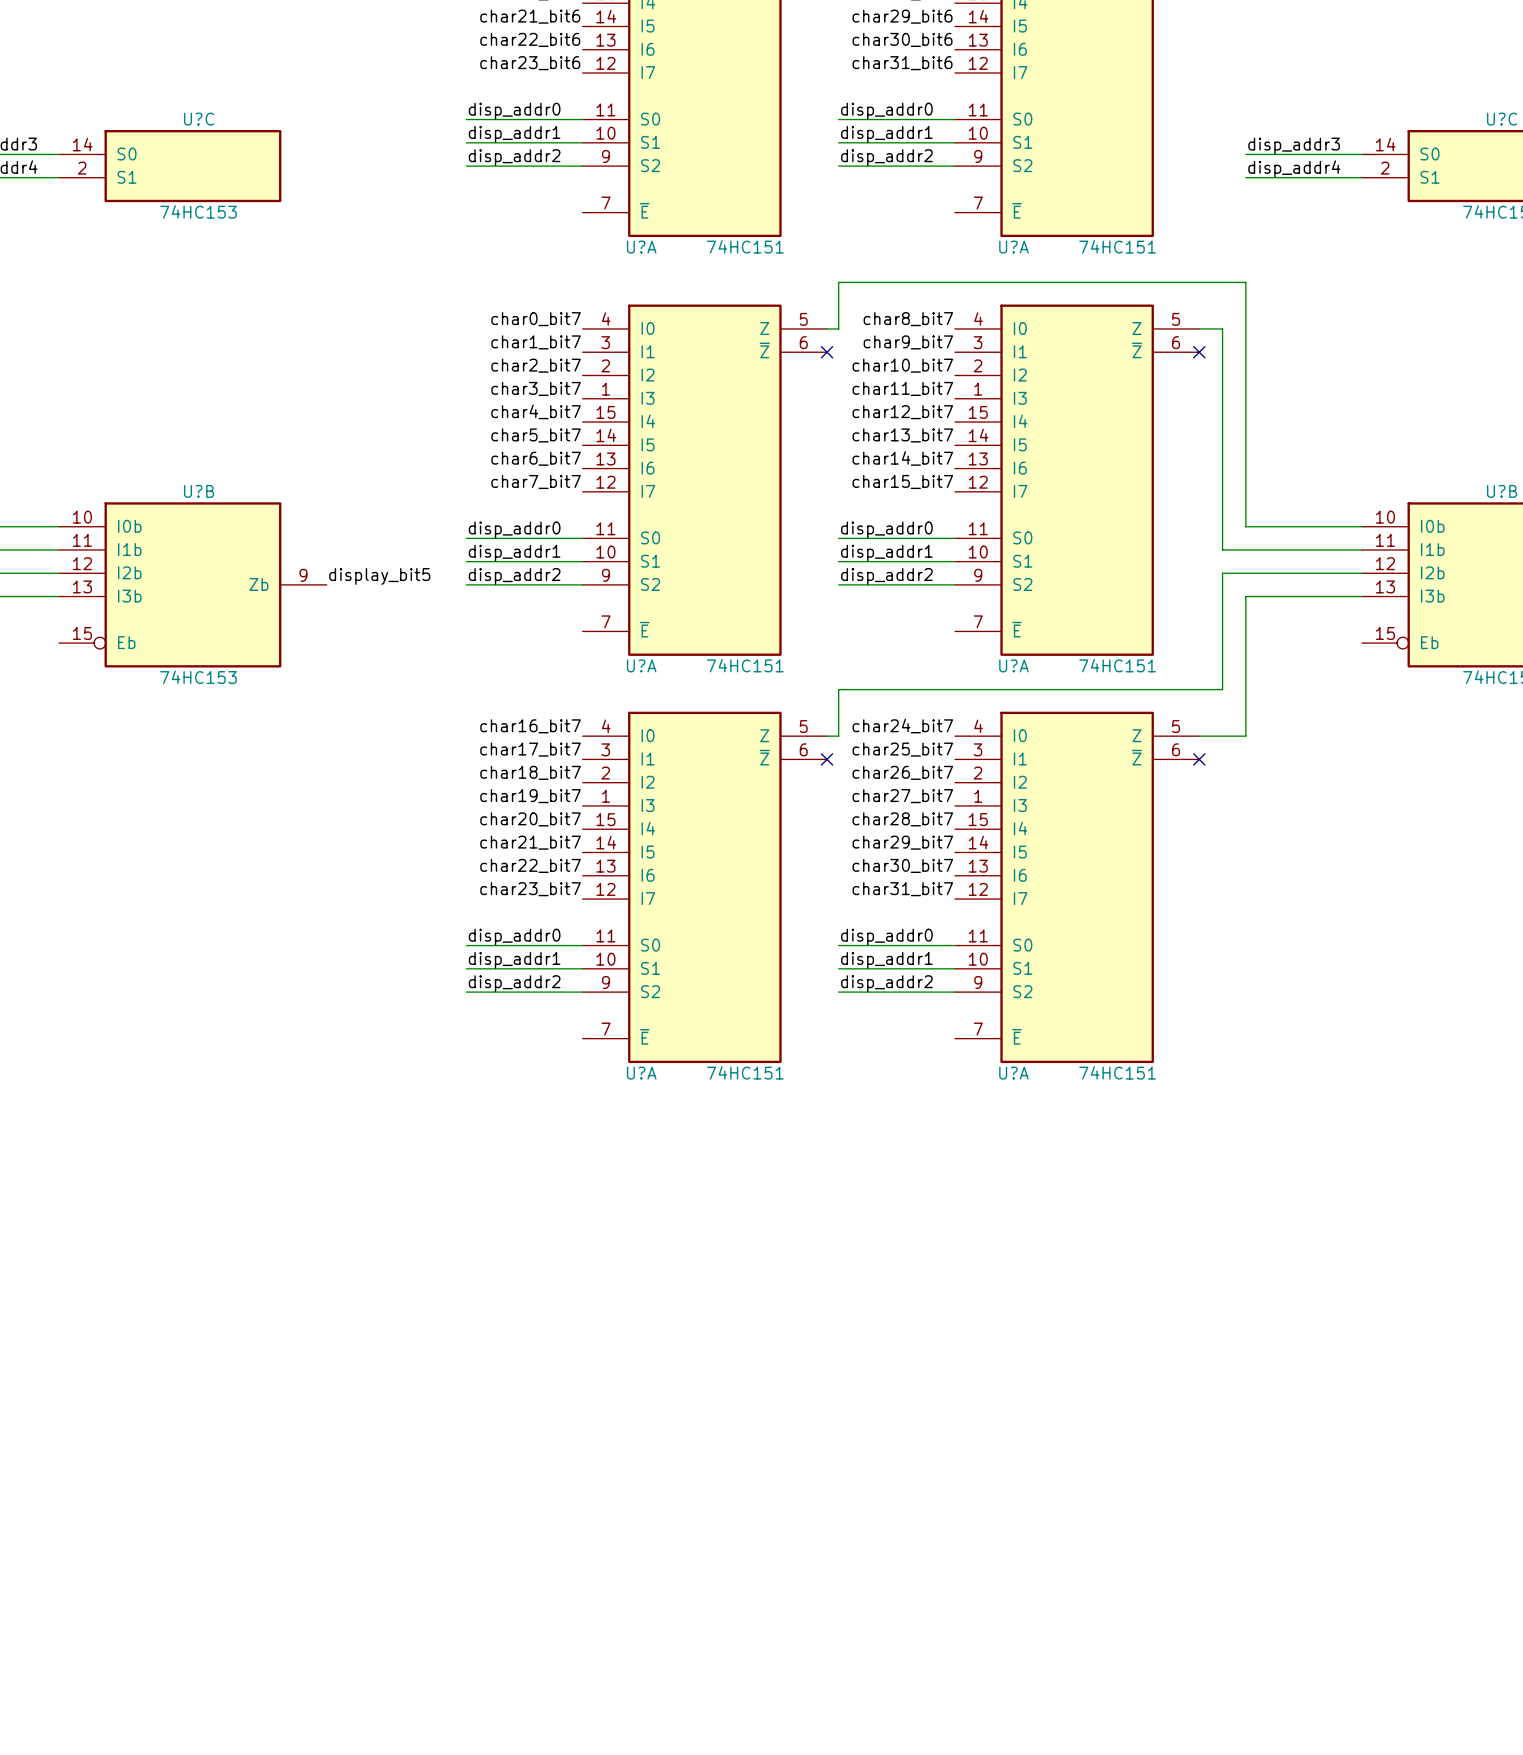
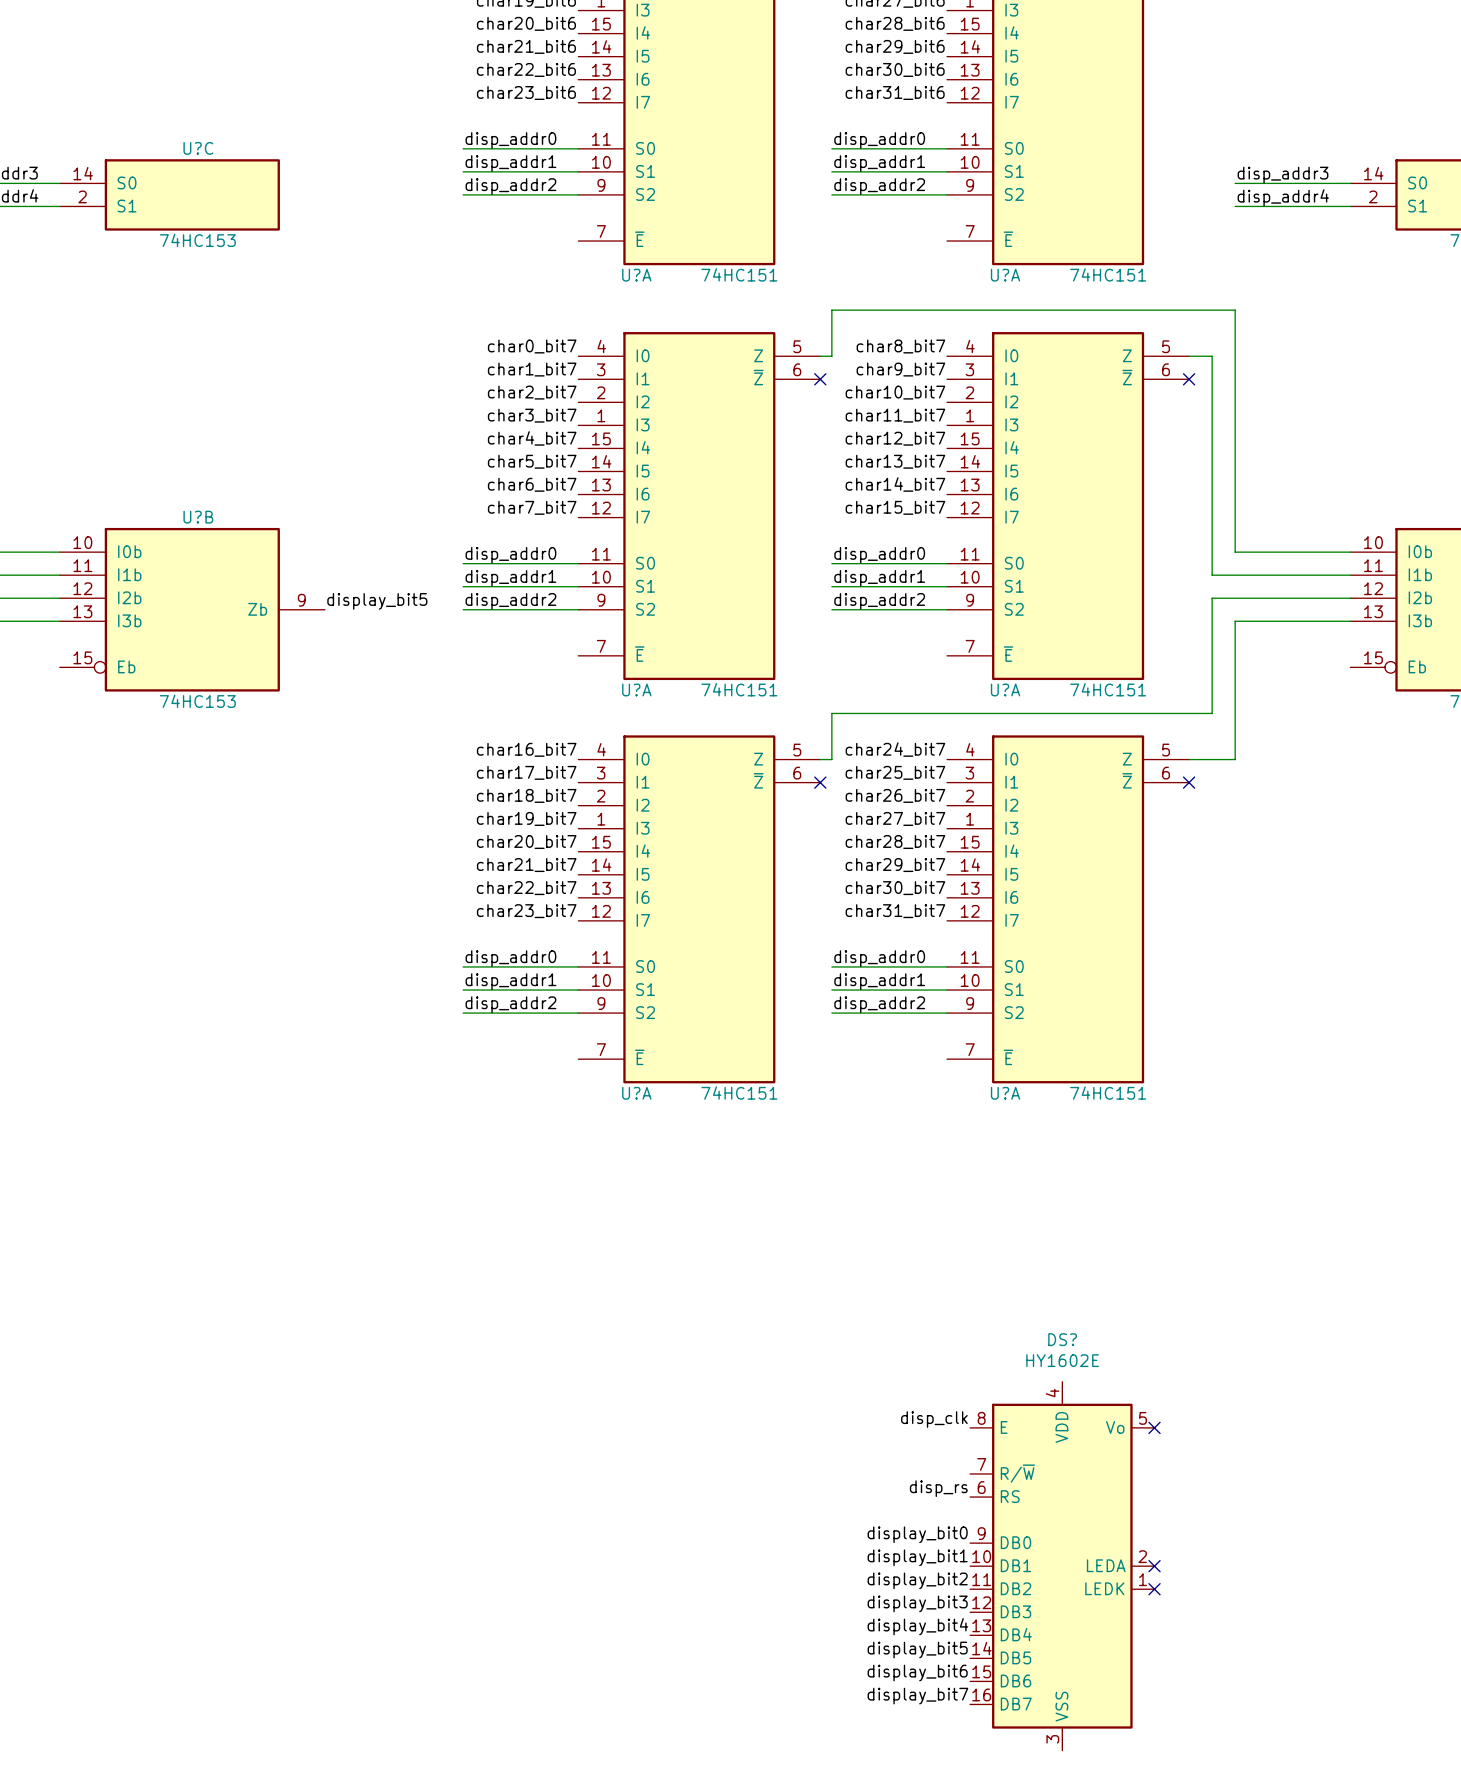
label: none -> disp_clk (934, 1419)
no-connect mark: none -> (1154, 1427)
label: none -> disp_rs (938, 1488)
label: none -> display_bit0 (917, 1534)
label: none -> display_bit1 (917, 1557)
DS?: none -> HY1602E (1062, 1566)
no-connect mark: none -> (1154, 1566)
label: none -> display_bit2 (917, 1580)
no-connect mark: none -> (1154, 1589)
label: none -> display_bit3 (917, 1603)
label: none -> display_bit4 (917, 1626)
label: none -> display_bit5 (917, 1649)
label: none -> display_bit6 (917, 1673)
label: none -> display_bit7 (917, 1696)

